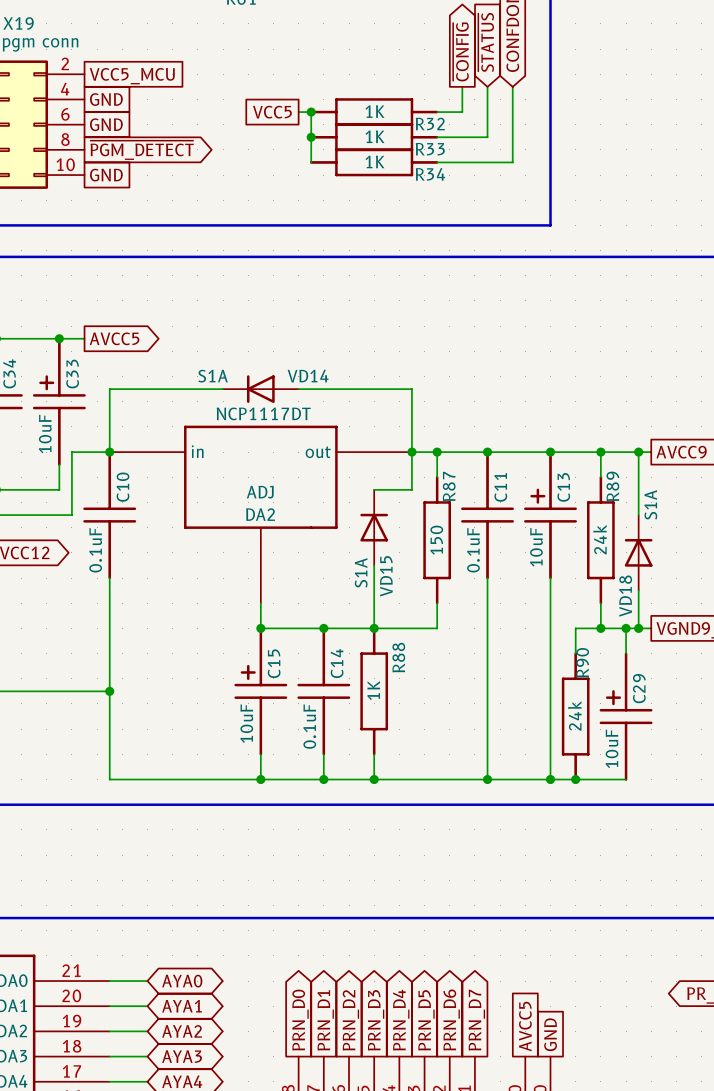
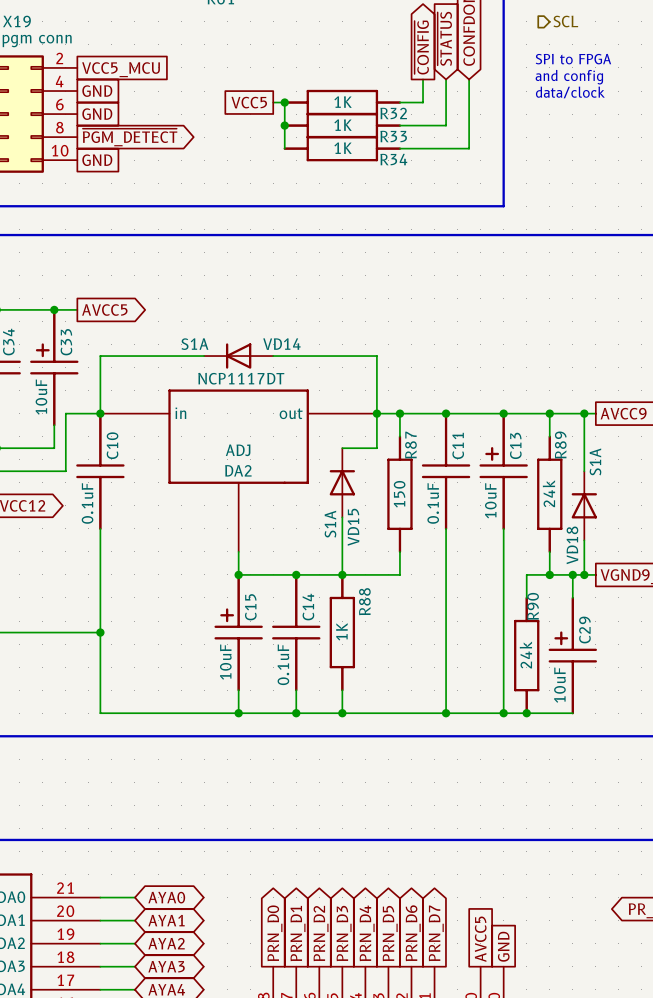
hierarchical label: none -> SCL (565, 21)
text: none -> SPI to FPGA (573, 59)
text: none -> and config (569, 77)
text: none -> data/clock (570, 92)

